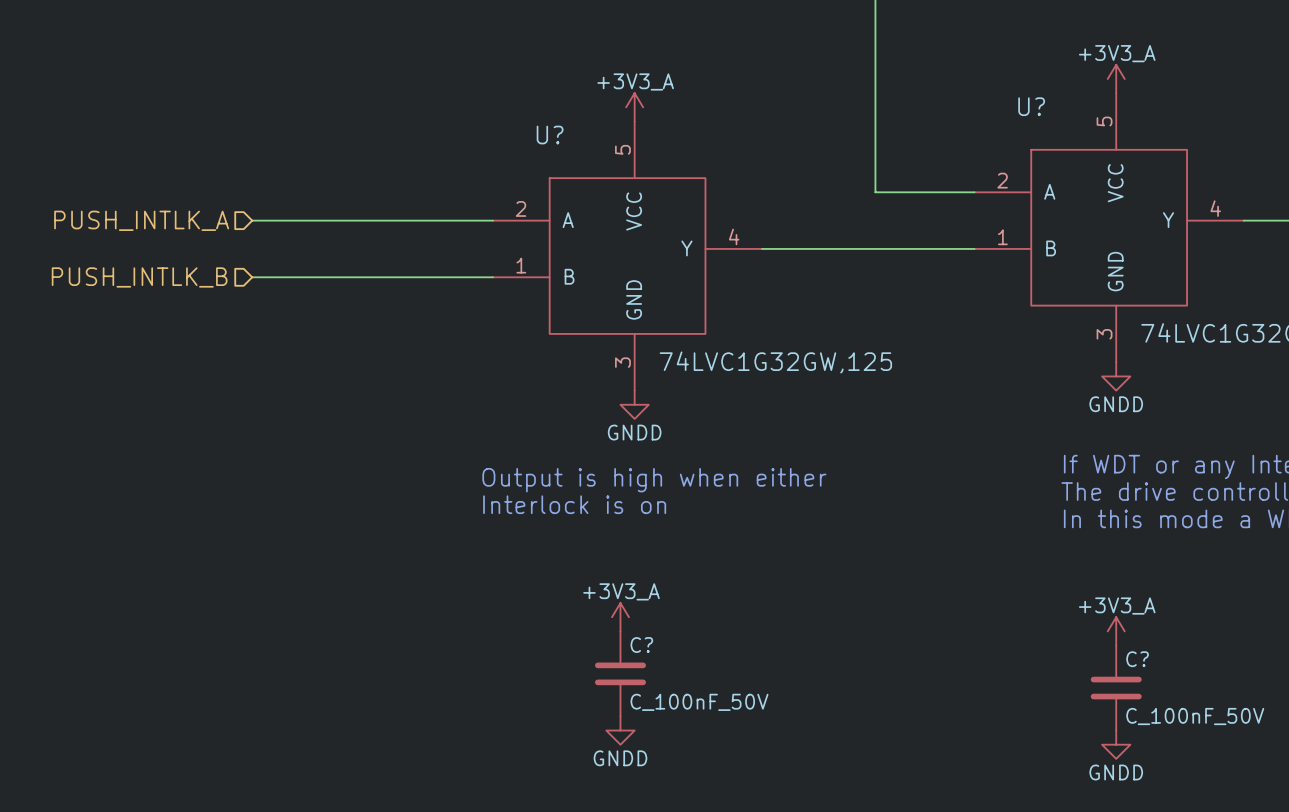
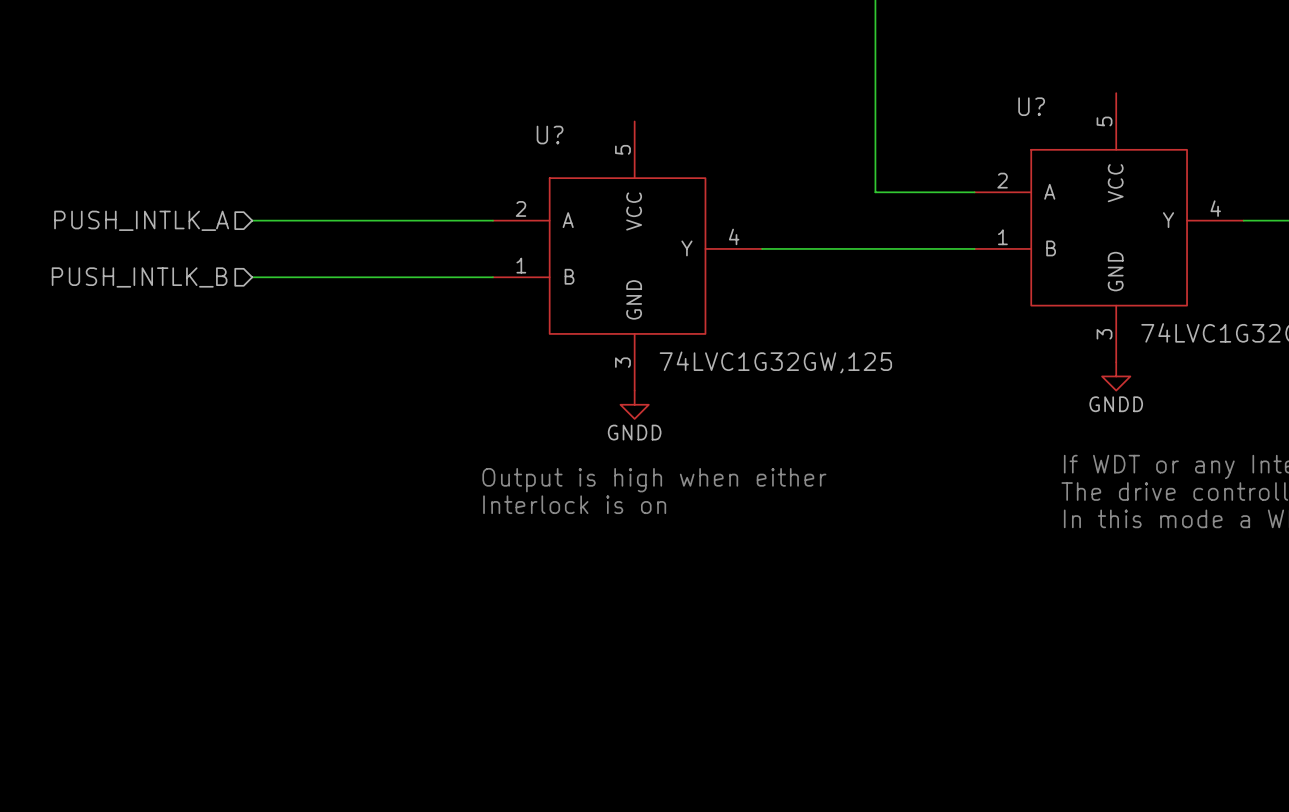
power symbol: +3V3_A (1116, 79) -> none
power symbol: +3V3_A (634, 107) -> none
power symbol: +3V3_A (620, 617) -> none
power symbol: +3V3_A (1116, 631) -> none
C?: C_100nF_50V (620, 673) -> none
C?: C_100nF_50V (1116, 688) -> none
power symbol: GNDD (620, 730) -> none
power symbol: GNDD (1116, 744) -> none

